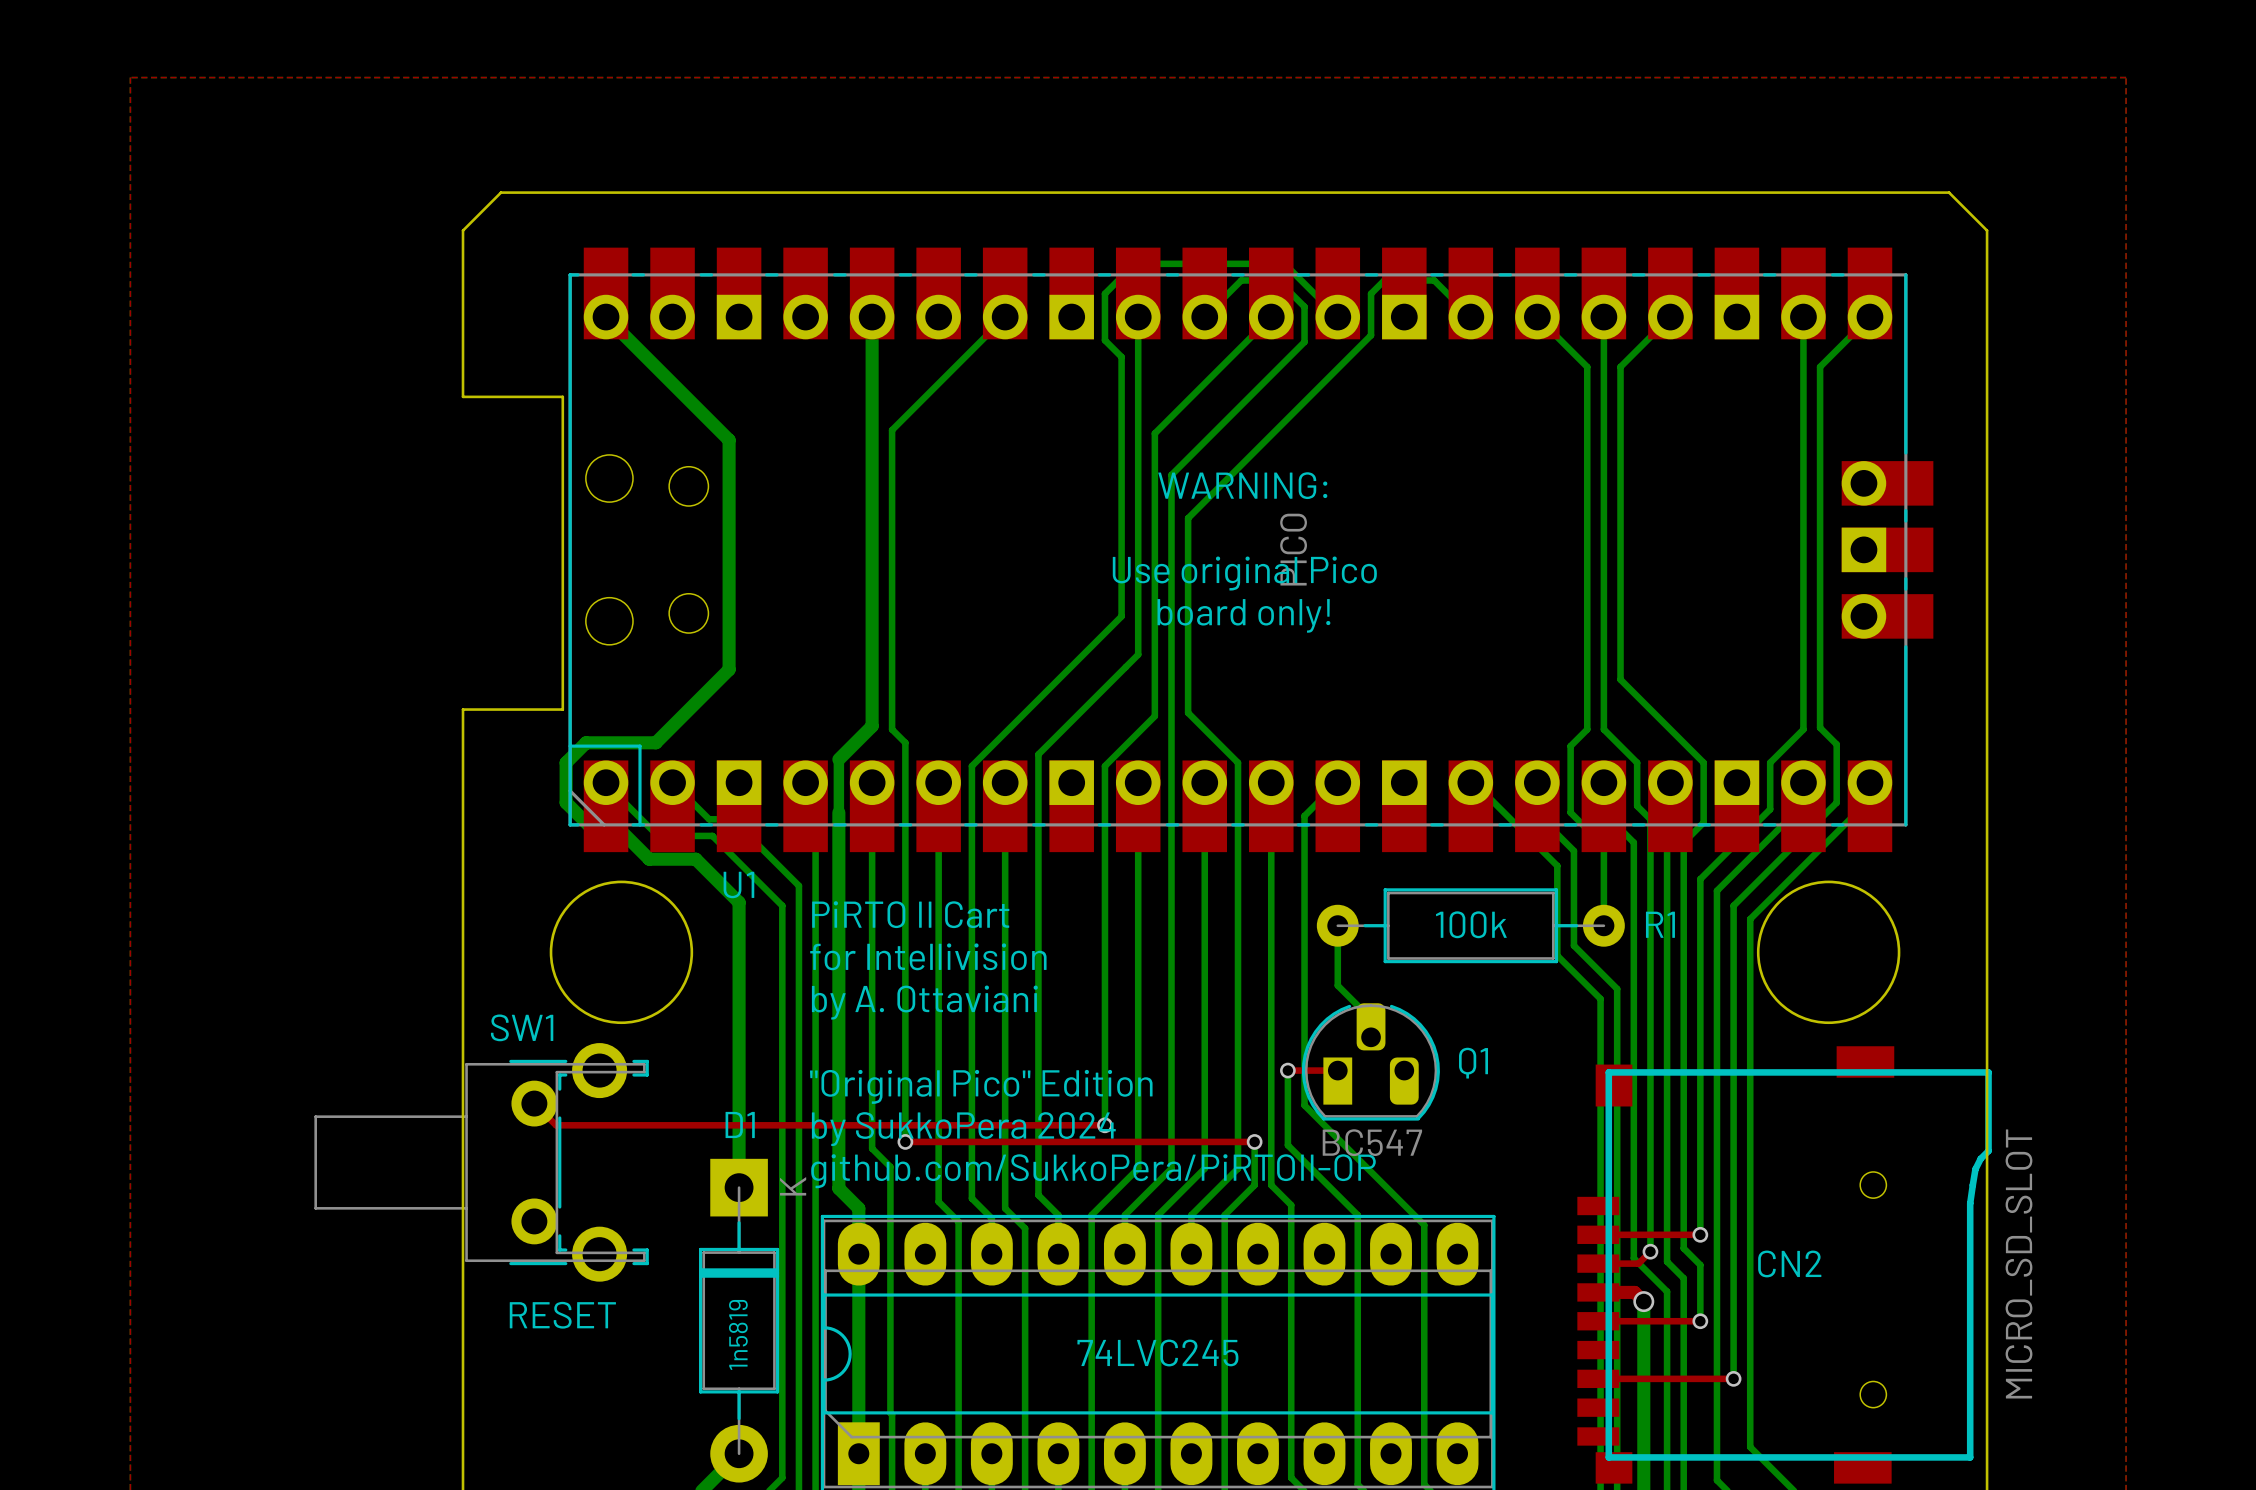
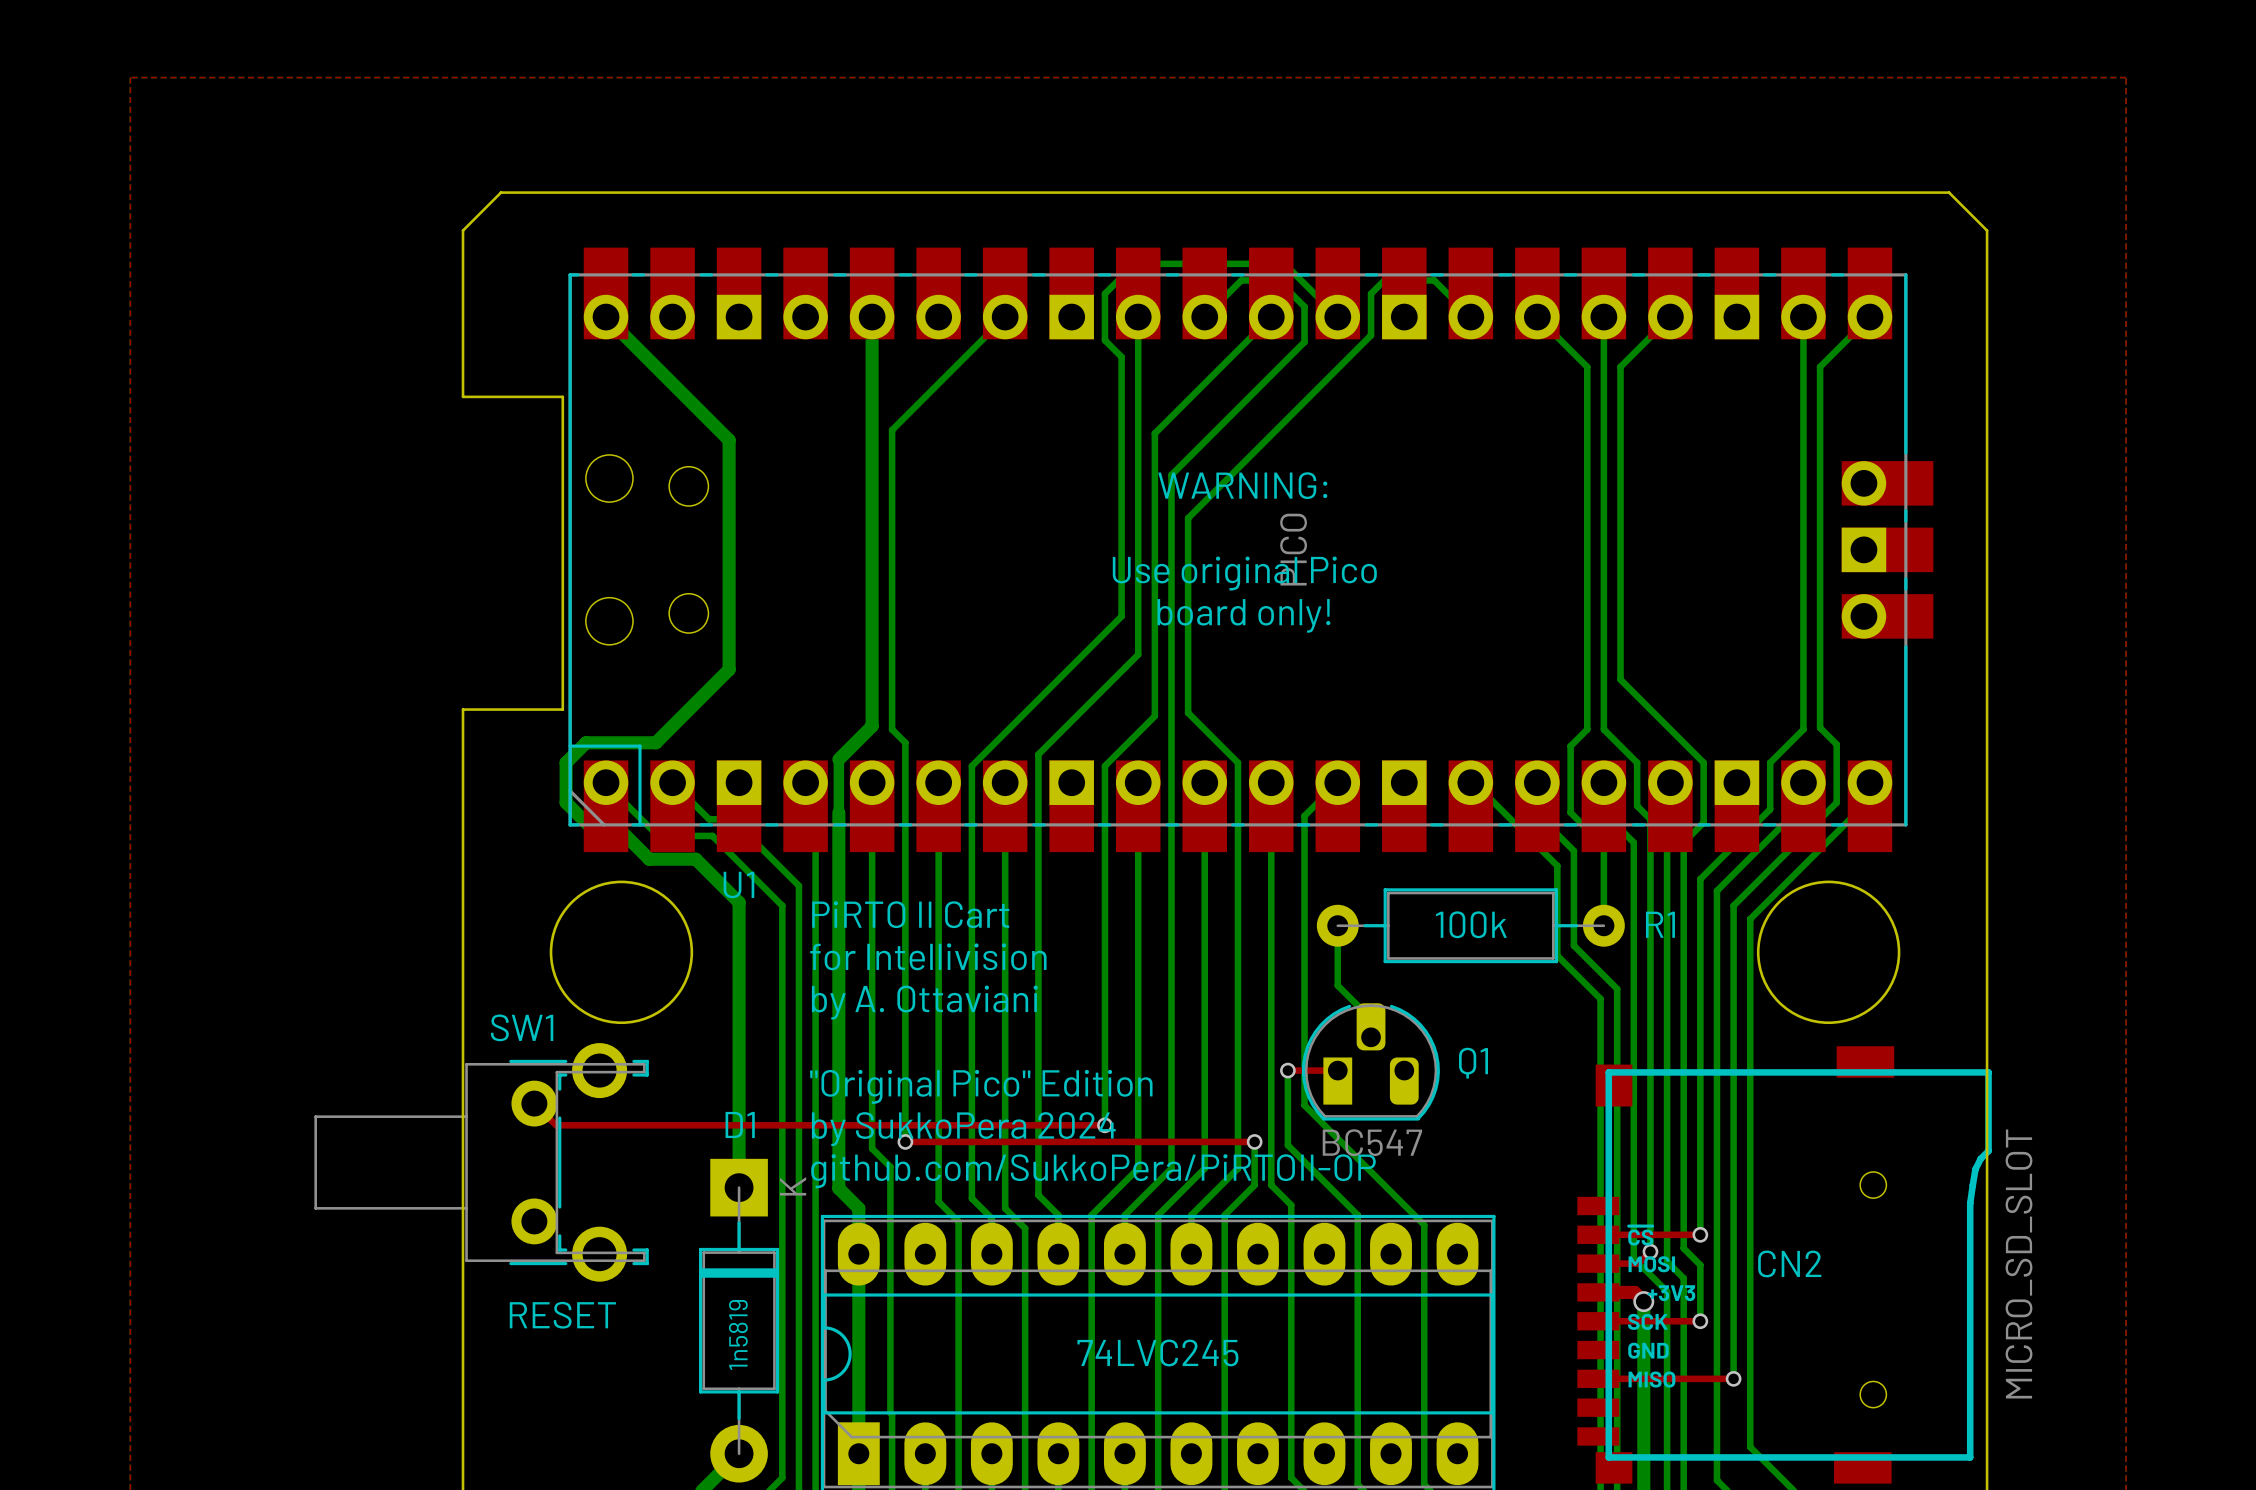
text: none -> ~{CS} (1640, 1235)
text: none -> MOSI (1651, 1264)
text: none -> +3V3 (1671, 1293)
text: none -> SCK (1647, 1321)
text: none -> GND (1648, 1350)
text: none -> MISO (1651, 1379)

